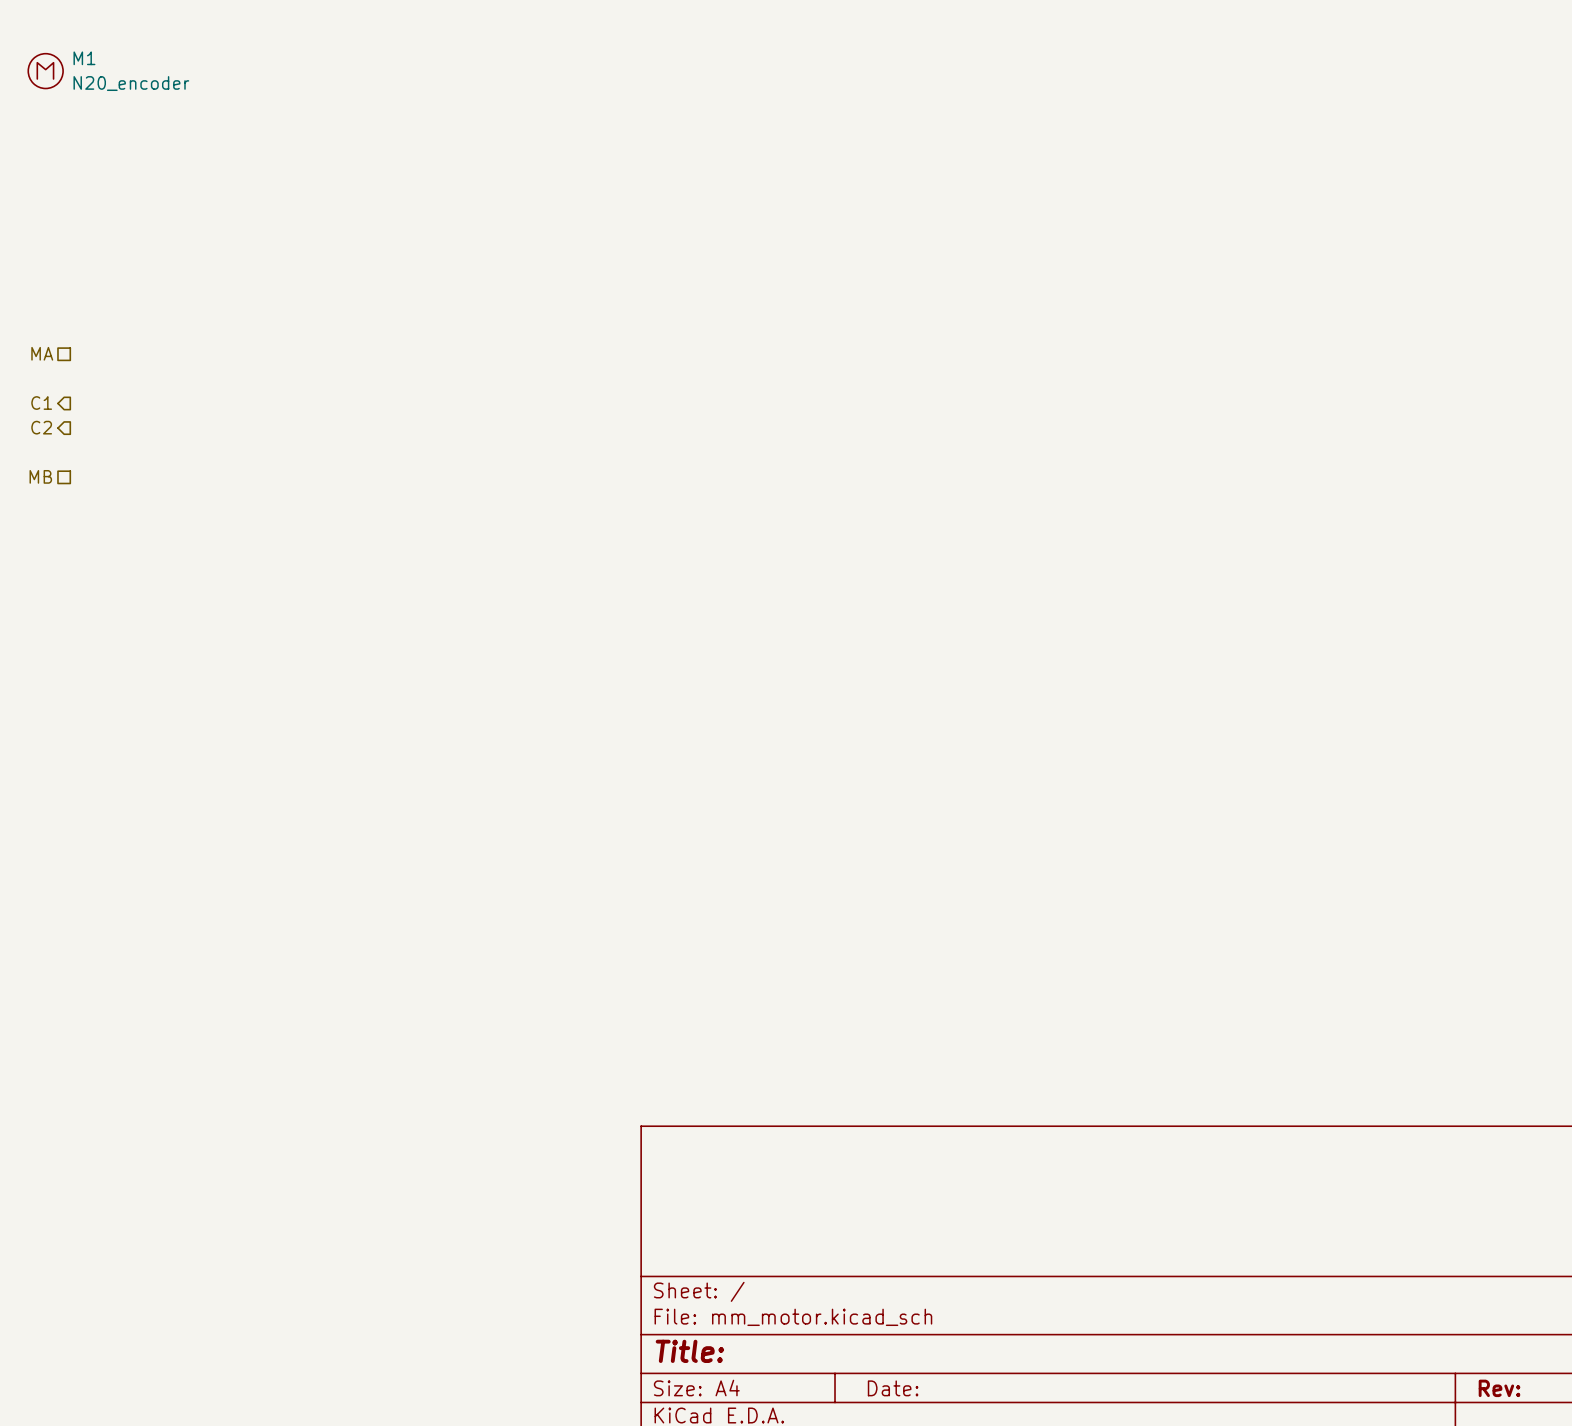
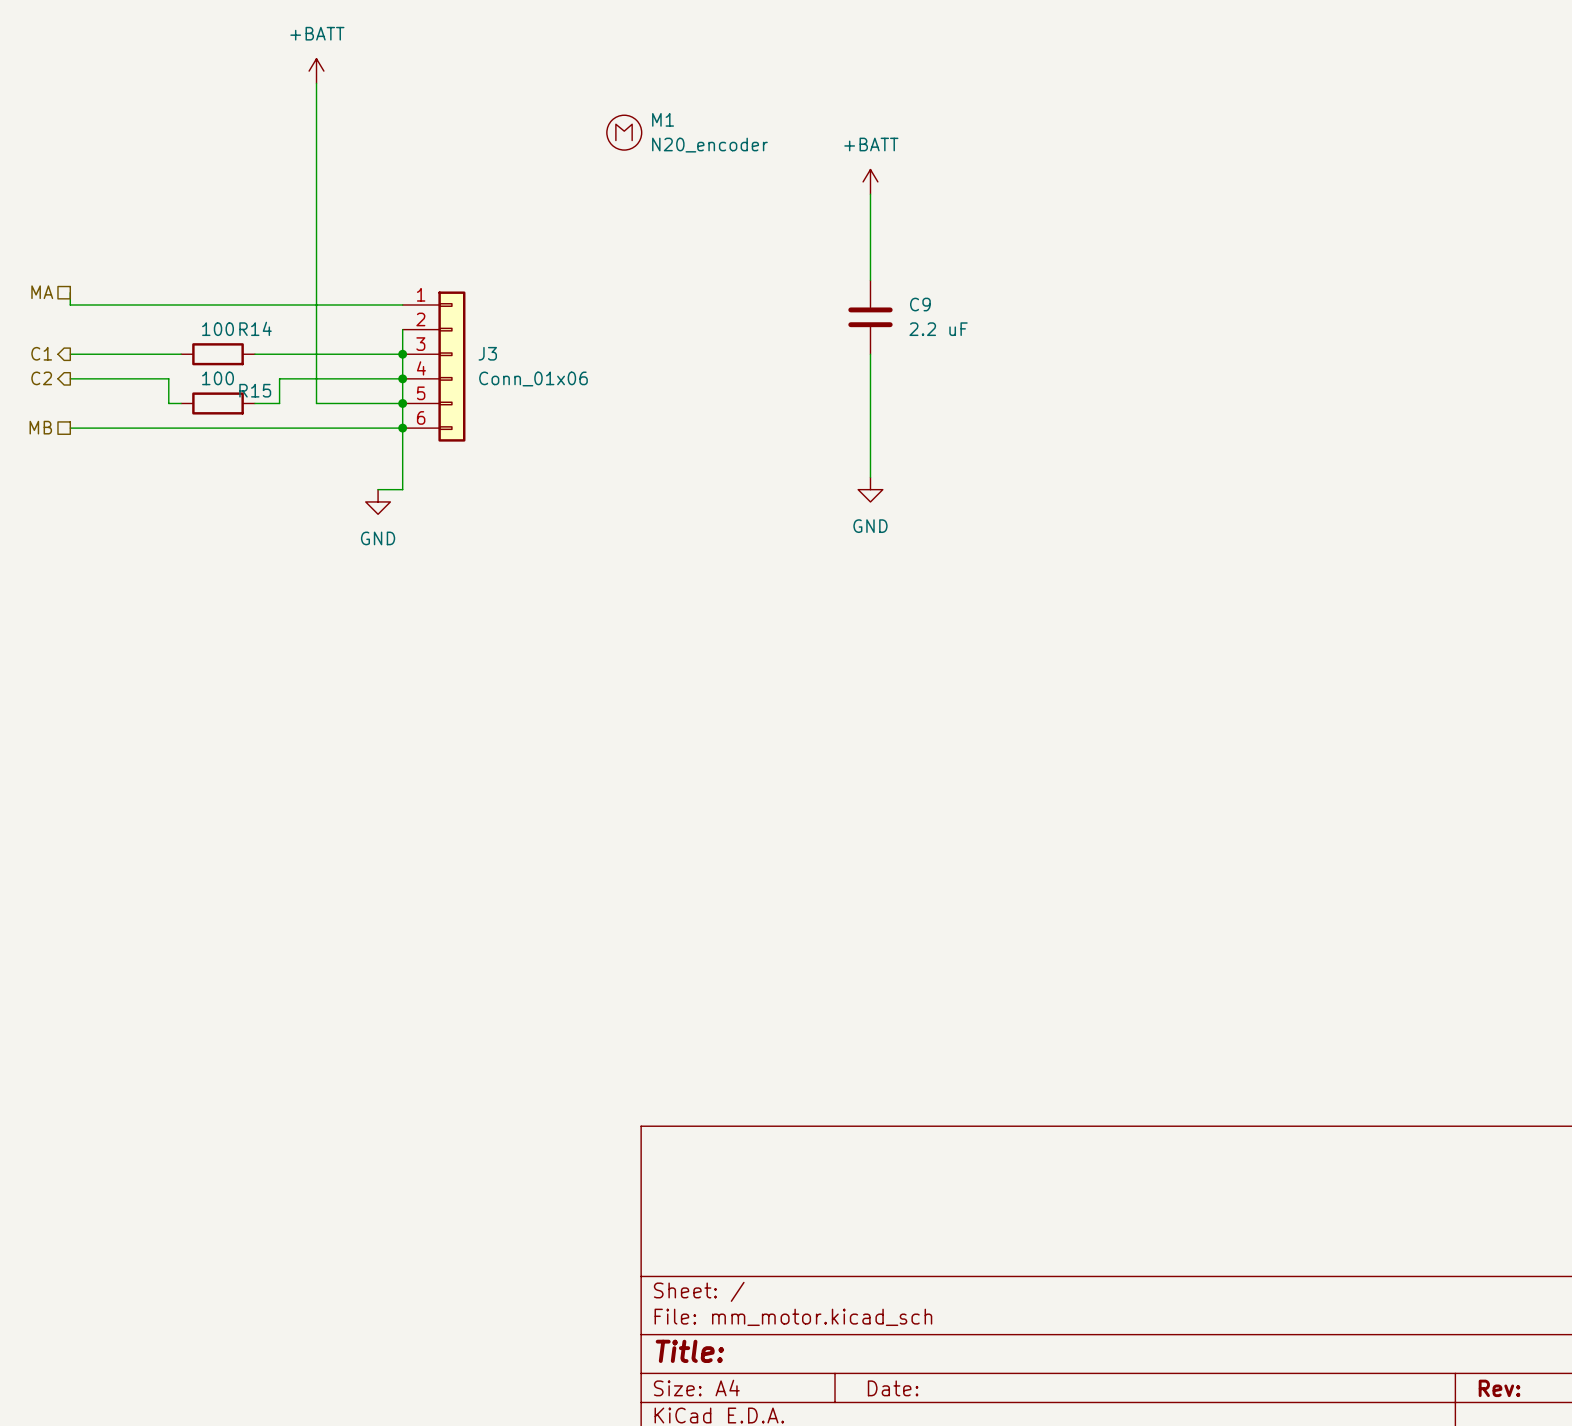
M1 position: (45, 71) -> (624, 132)
power symbol: none -> +BATT (316, 71)
wire: none -> (316, 83) (316, 403) (402, 403)
power symbol: none -> +BATT (870, 181)
wire: none -> (870, 194) (870, 280)
hierarchical label: none -> MA (42, 292)
wire: none -> (70, 292) (70, 304) (402, 304)
C9: none -> 2.2 uF (870, 317)
wire: none -> (402, 329) (402, 489) (378, 489)
hierarchical label shape: passive (42, 353) -> output (41, 353)
hierarchical label: MA (42, 353) -> C1 (41, 353)
wire: none -> (70, 354) (181, 354)
R14: none -> 100 (218, 354)
wire: none -> (254, 354) (402, 354)
junction: none -> (402, 354)
wire: none -> (870, 354) (870, 477)
J3: none -> Conn_01x06 (434, 366)
hierarchical label: none -> C2 (41, 378)
wire: none -> (70, 378) (168, 378) (168, 403) (181, 403)
wire: none -> (402, 378) (279, 378) (279, 403) (254, 403)
junction: none -> (402, 378)
hierarchical label: C1 (41, 403) -> none
R15: none -> 100 (218, 403)
junction: none -> (402, 403)
hierarchical label shape: output (41, 427) -> passive (40, 427)
hierarchical label: C2 (41, 427) -> MB (40, 427)
wire: none -> (70, 428) (402, 428)
junction: none -> (402, 428)
hierarchical label: MB (40, 476) -> none
power symbol: none -> GND (870, 489)
power symbol: none -> GND (378, 501)

